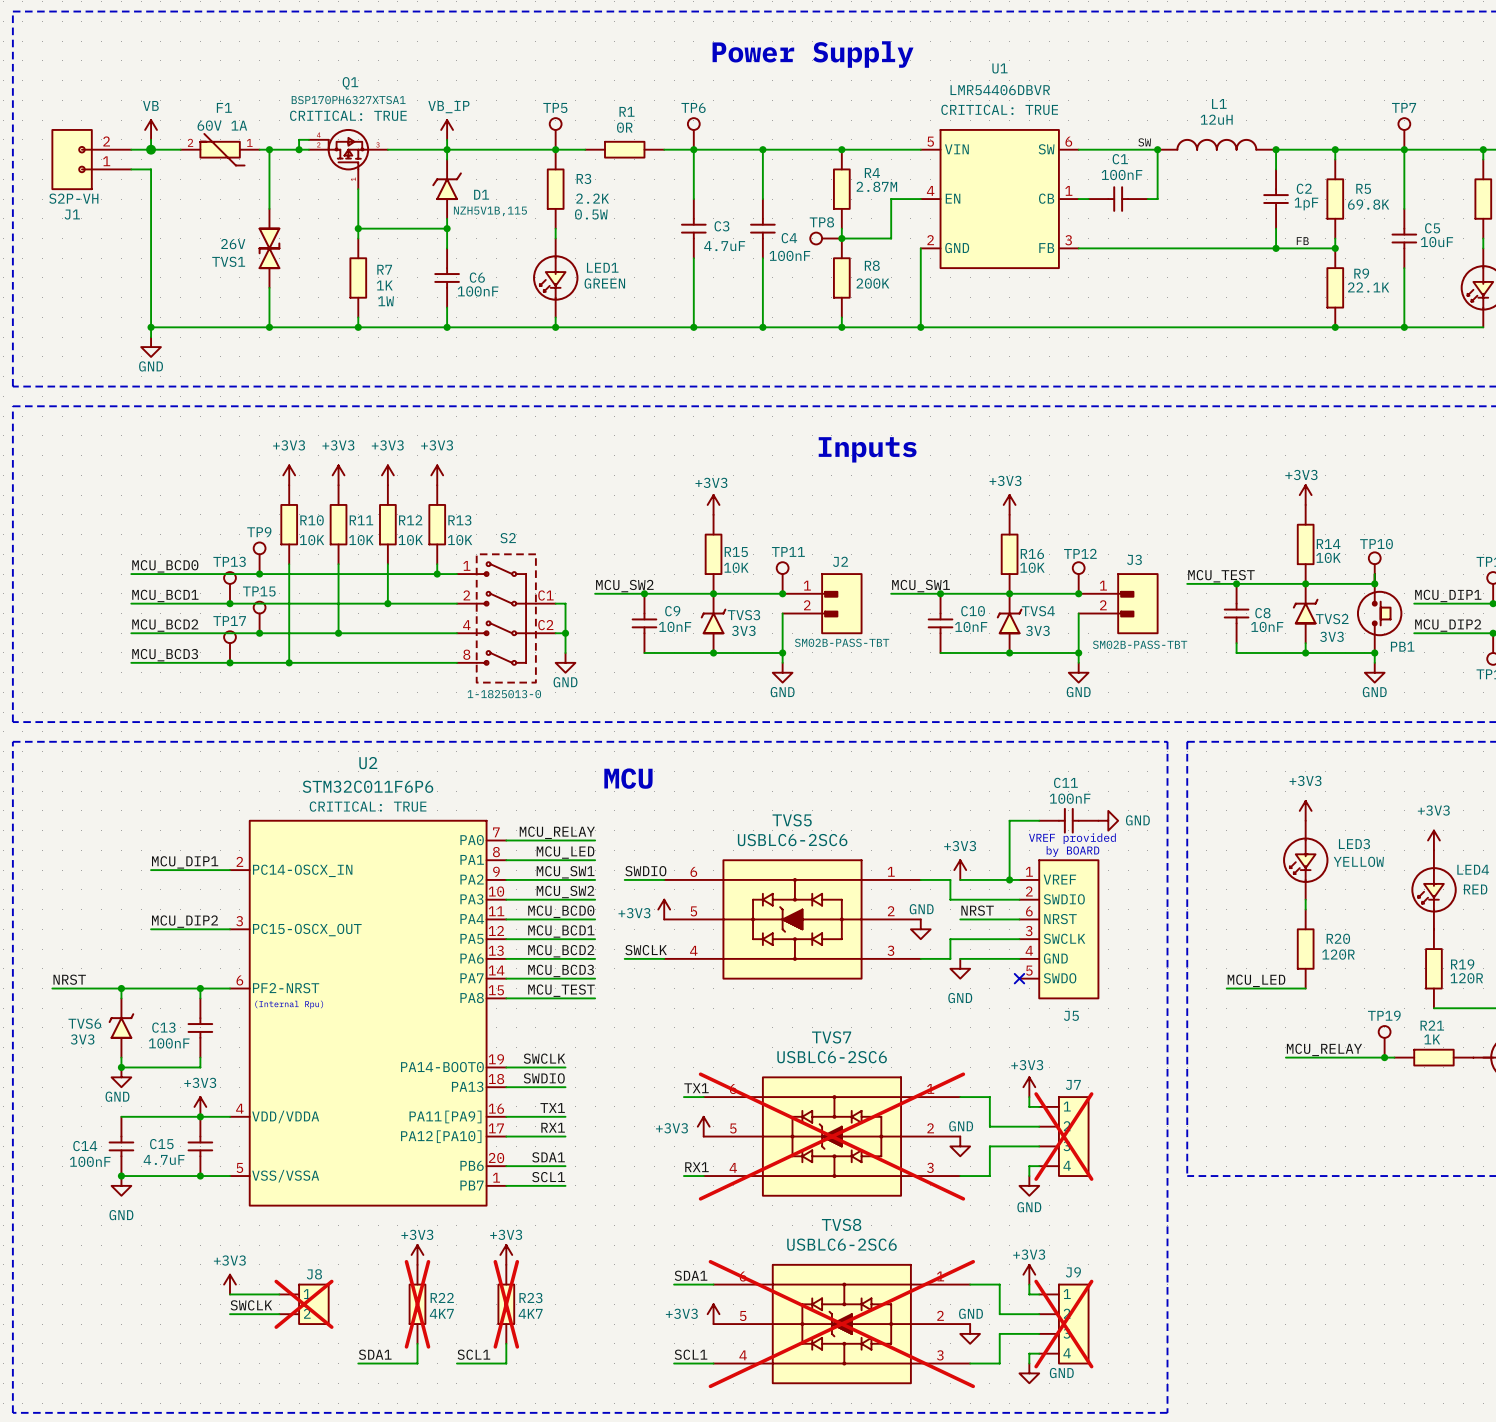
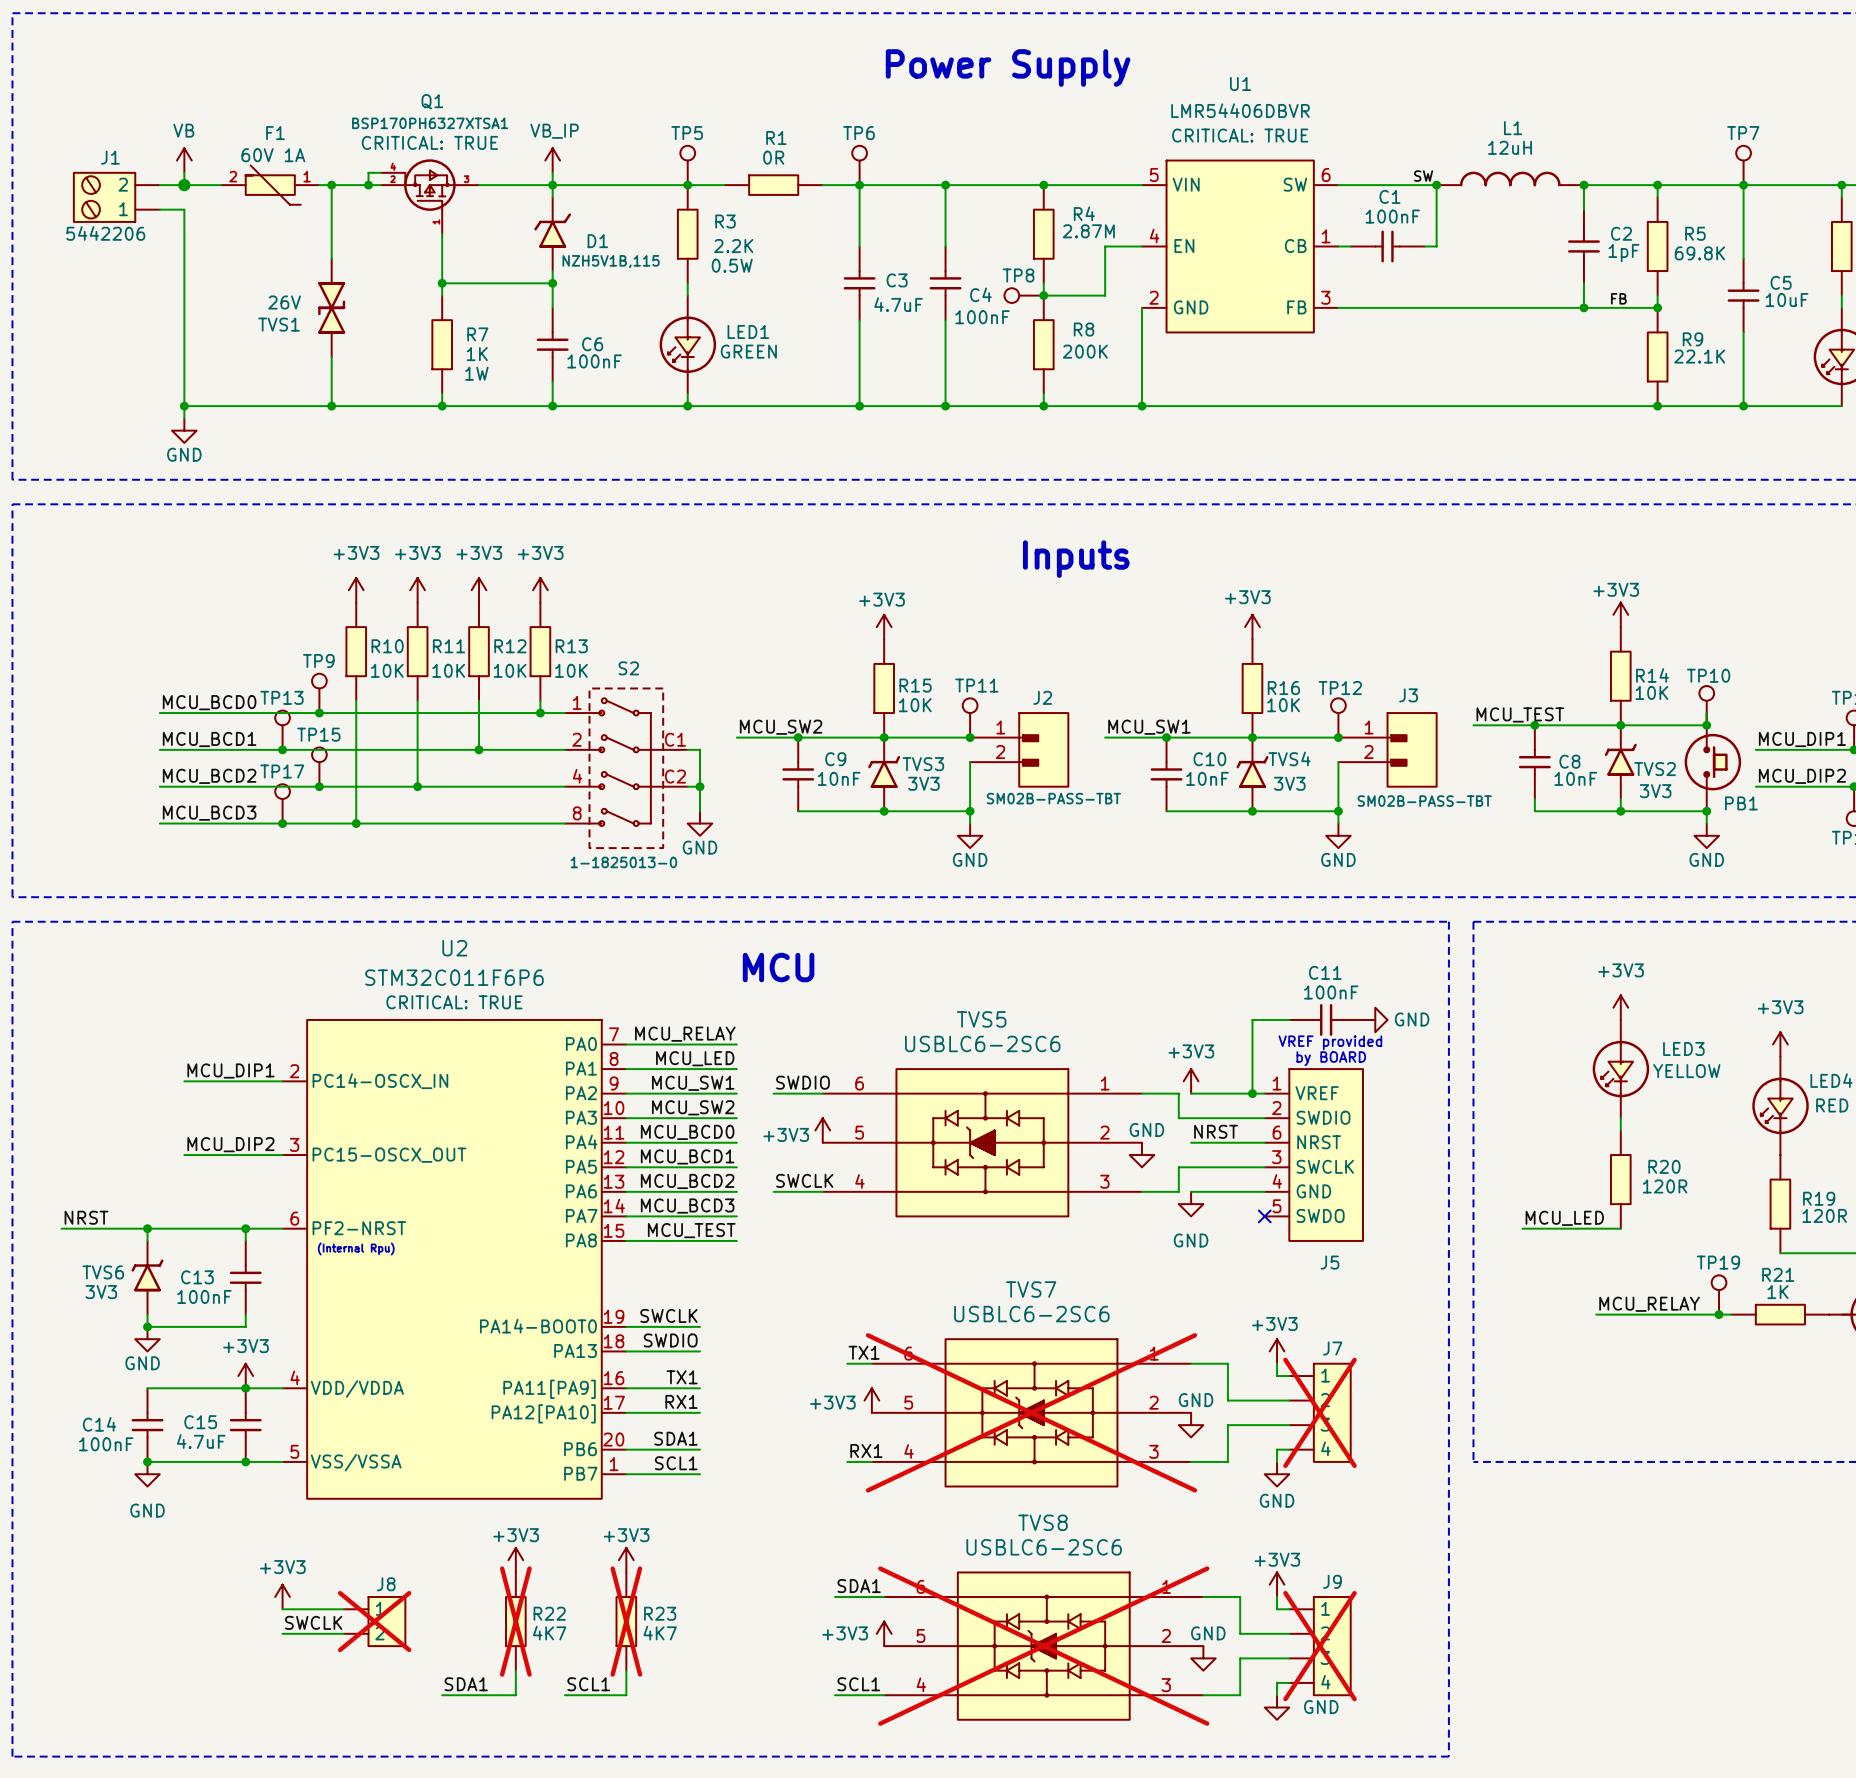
J1 symbol: [52, 129, 132, 190] -> [73, 172, 160, 222]
J1 value: S2P-VH (73, 198) -> 5442206 (105, 233)
J1 name position: J1 (72, 214) -> J1 (110, 157)

